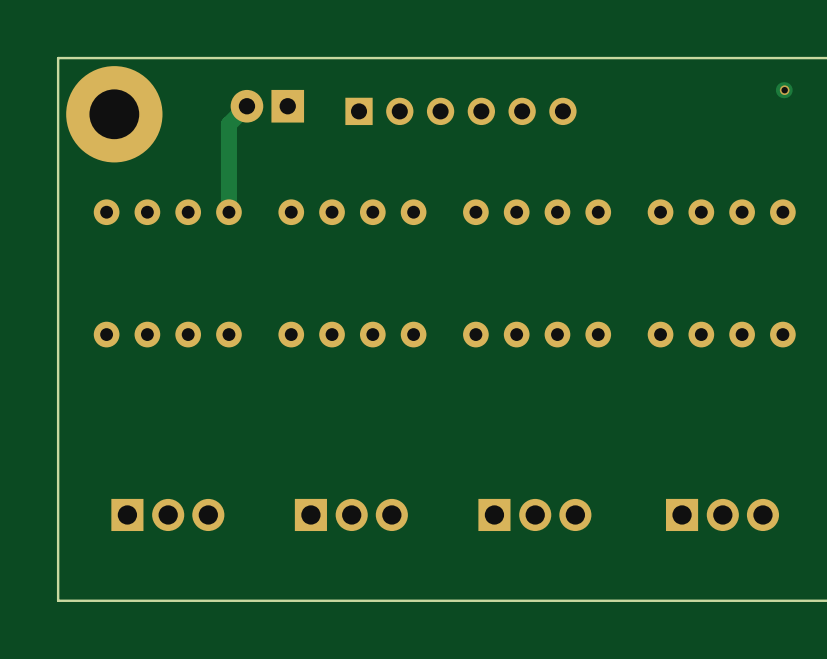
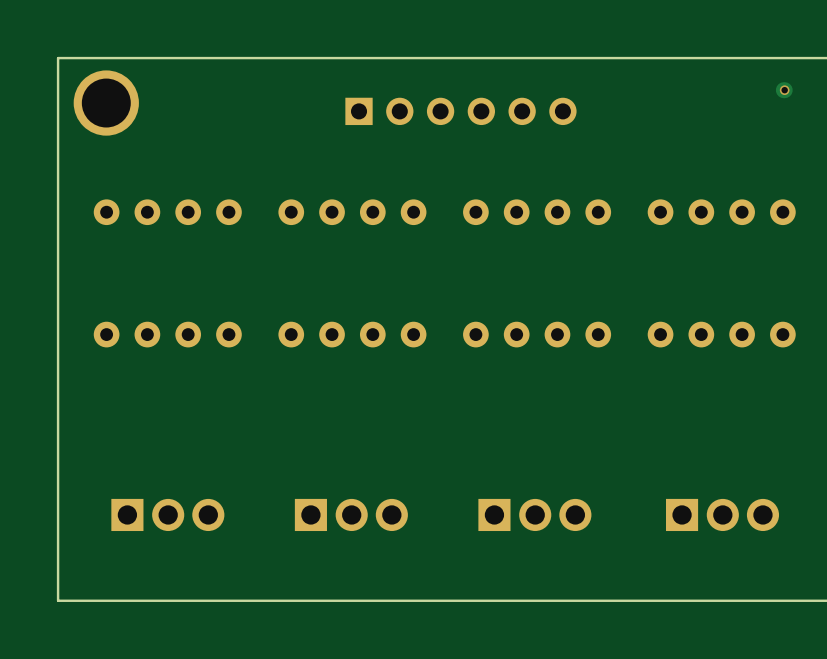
part footprint: [66, 66, 163, 163] -> [73, 70, 139, 136]
track: (246, 106) (228, 124) (228, 212) -> none
part: (267, 106) -> none

